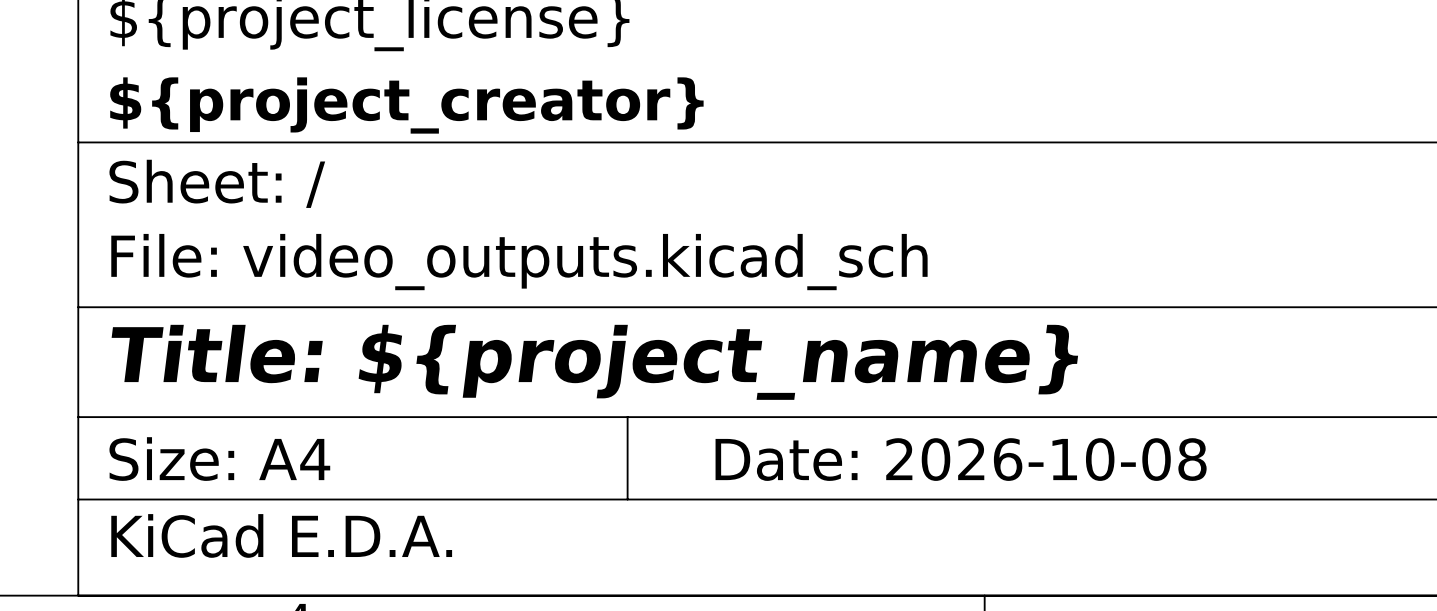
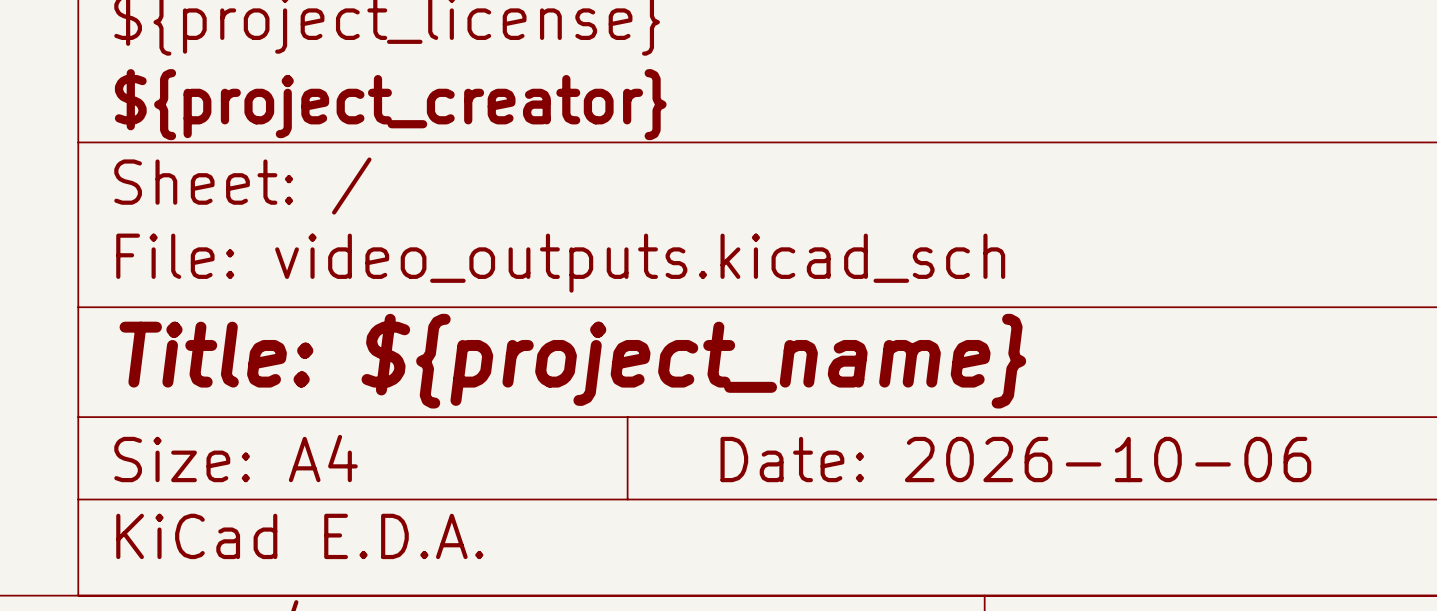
title block: Date: 2026-10-08 (961, 459) -> Date: 2026-10-06 (1015, 459)

